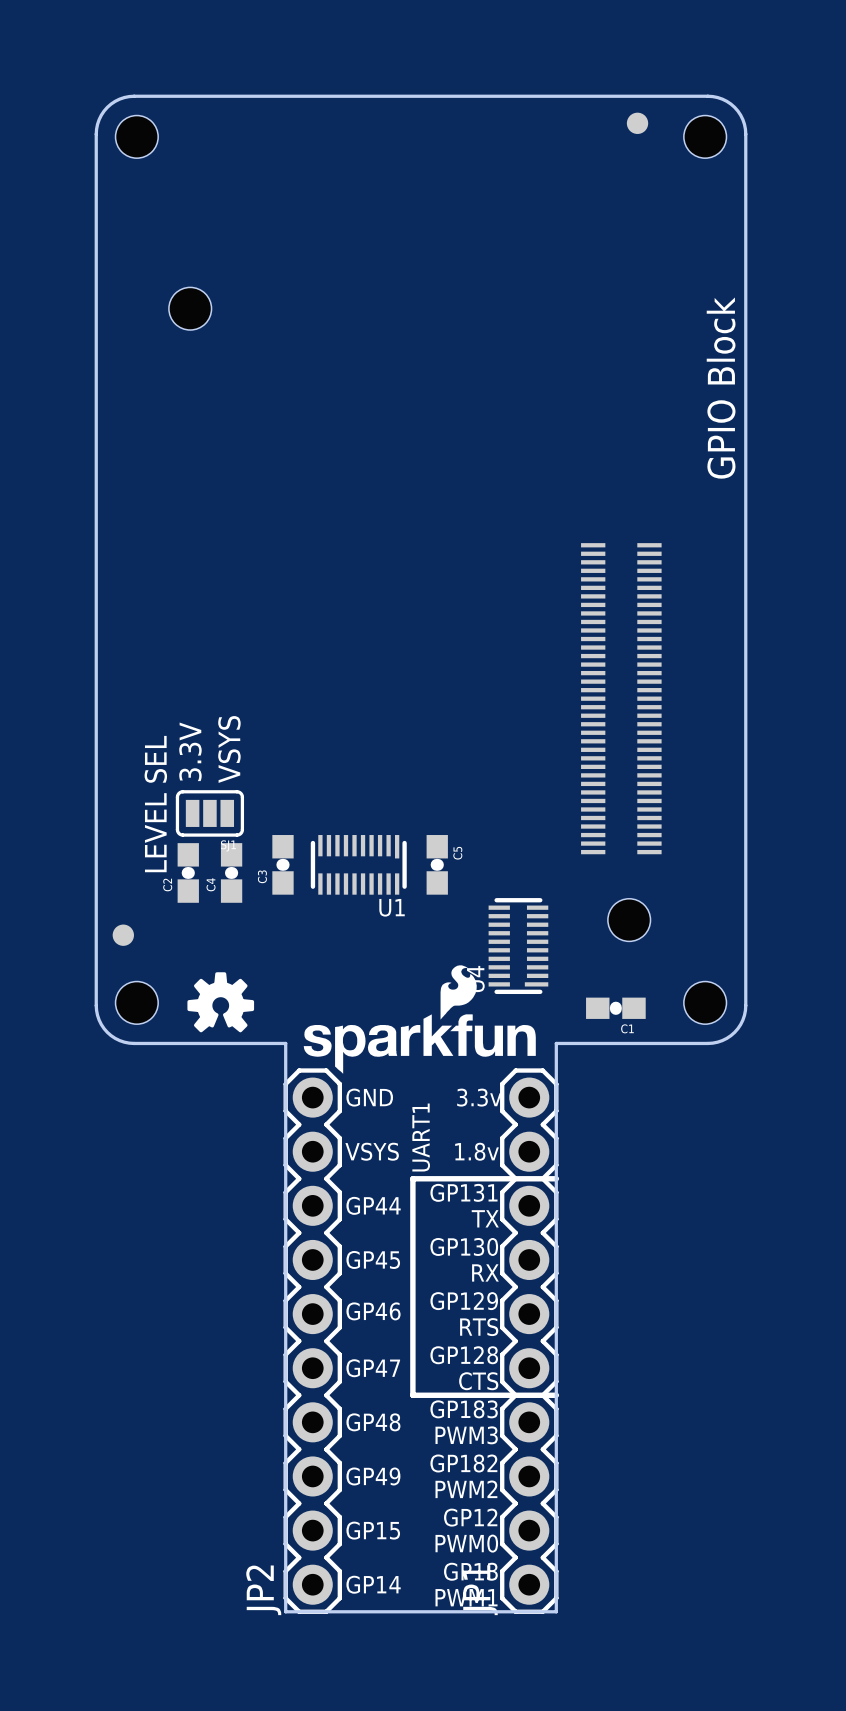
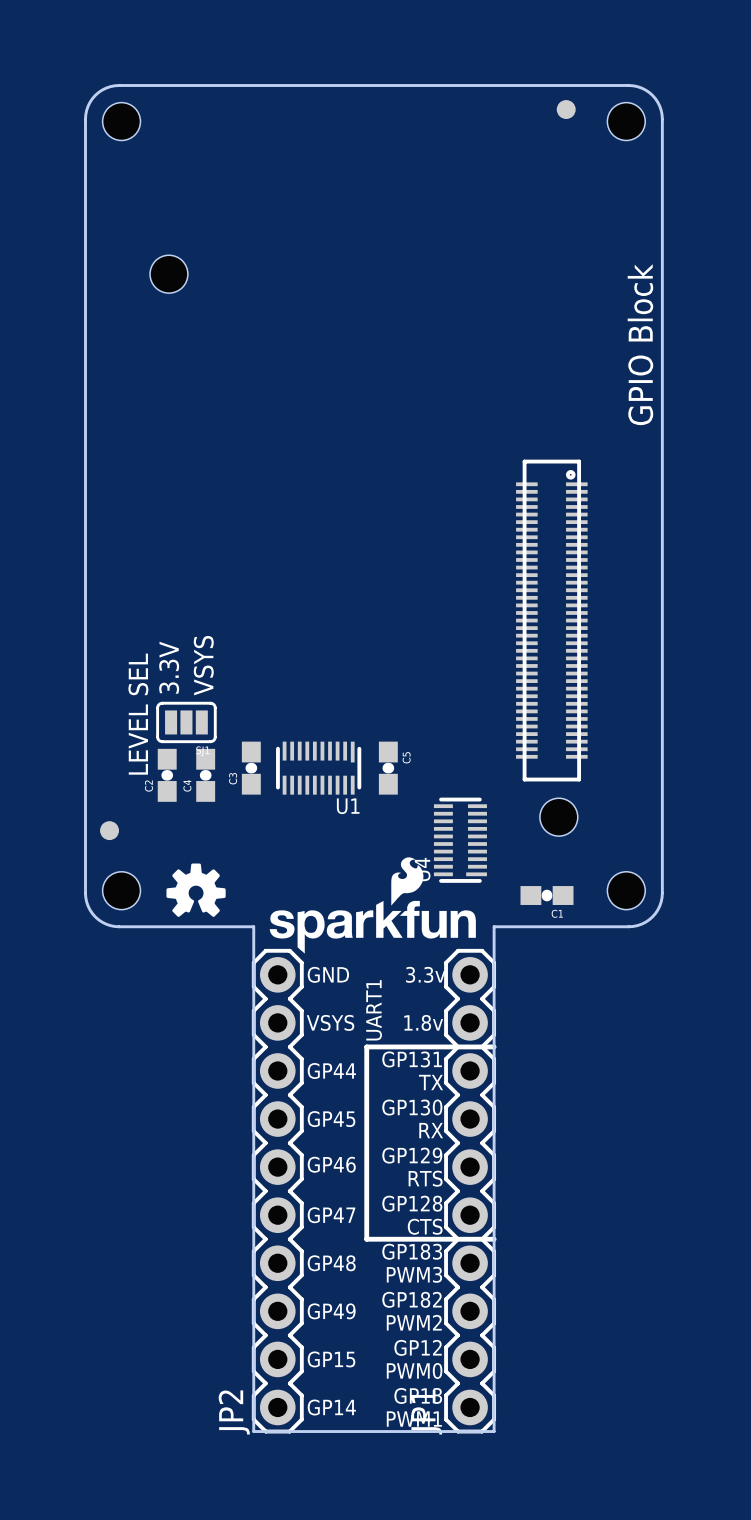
part footprint: [581, 543, 662, 855] -> [516, 459, 588, 782]

